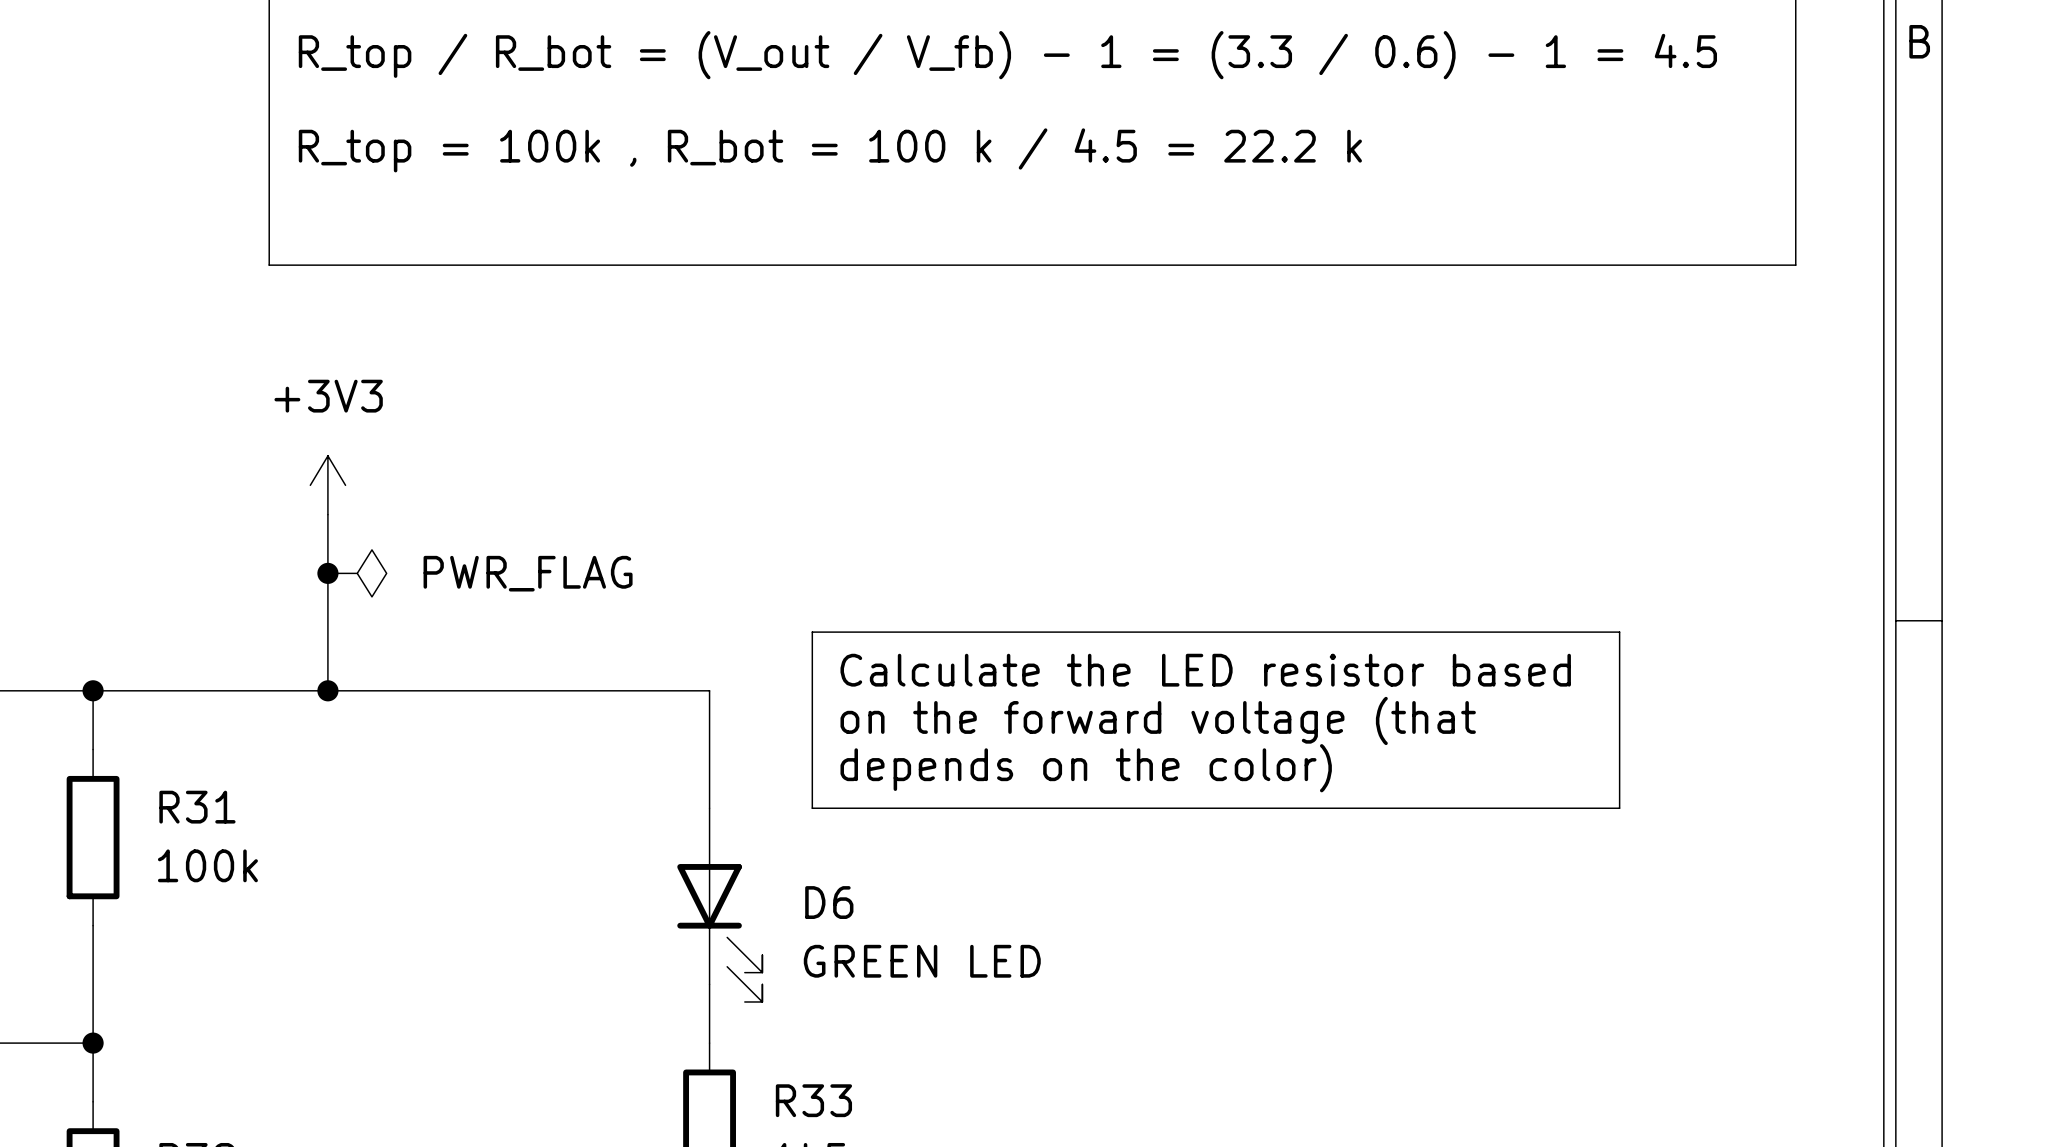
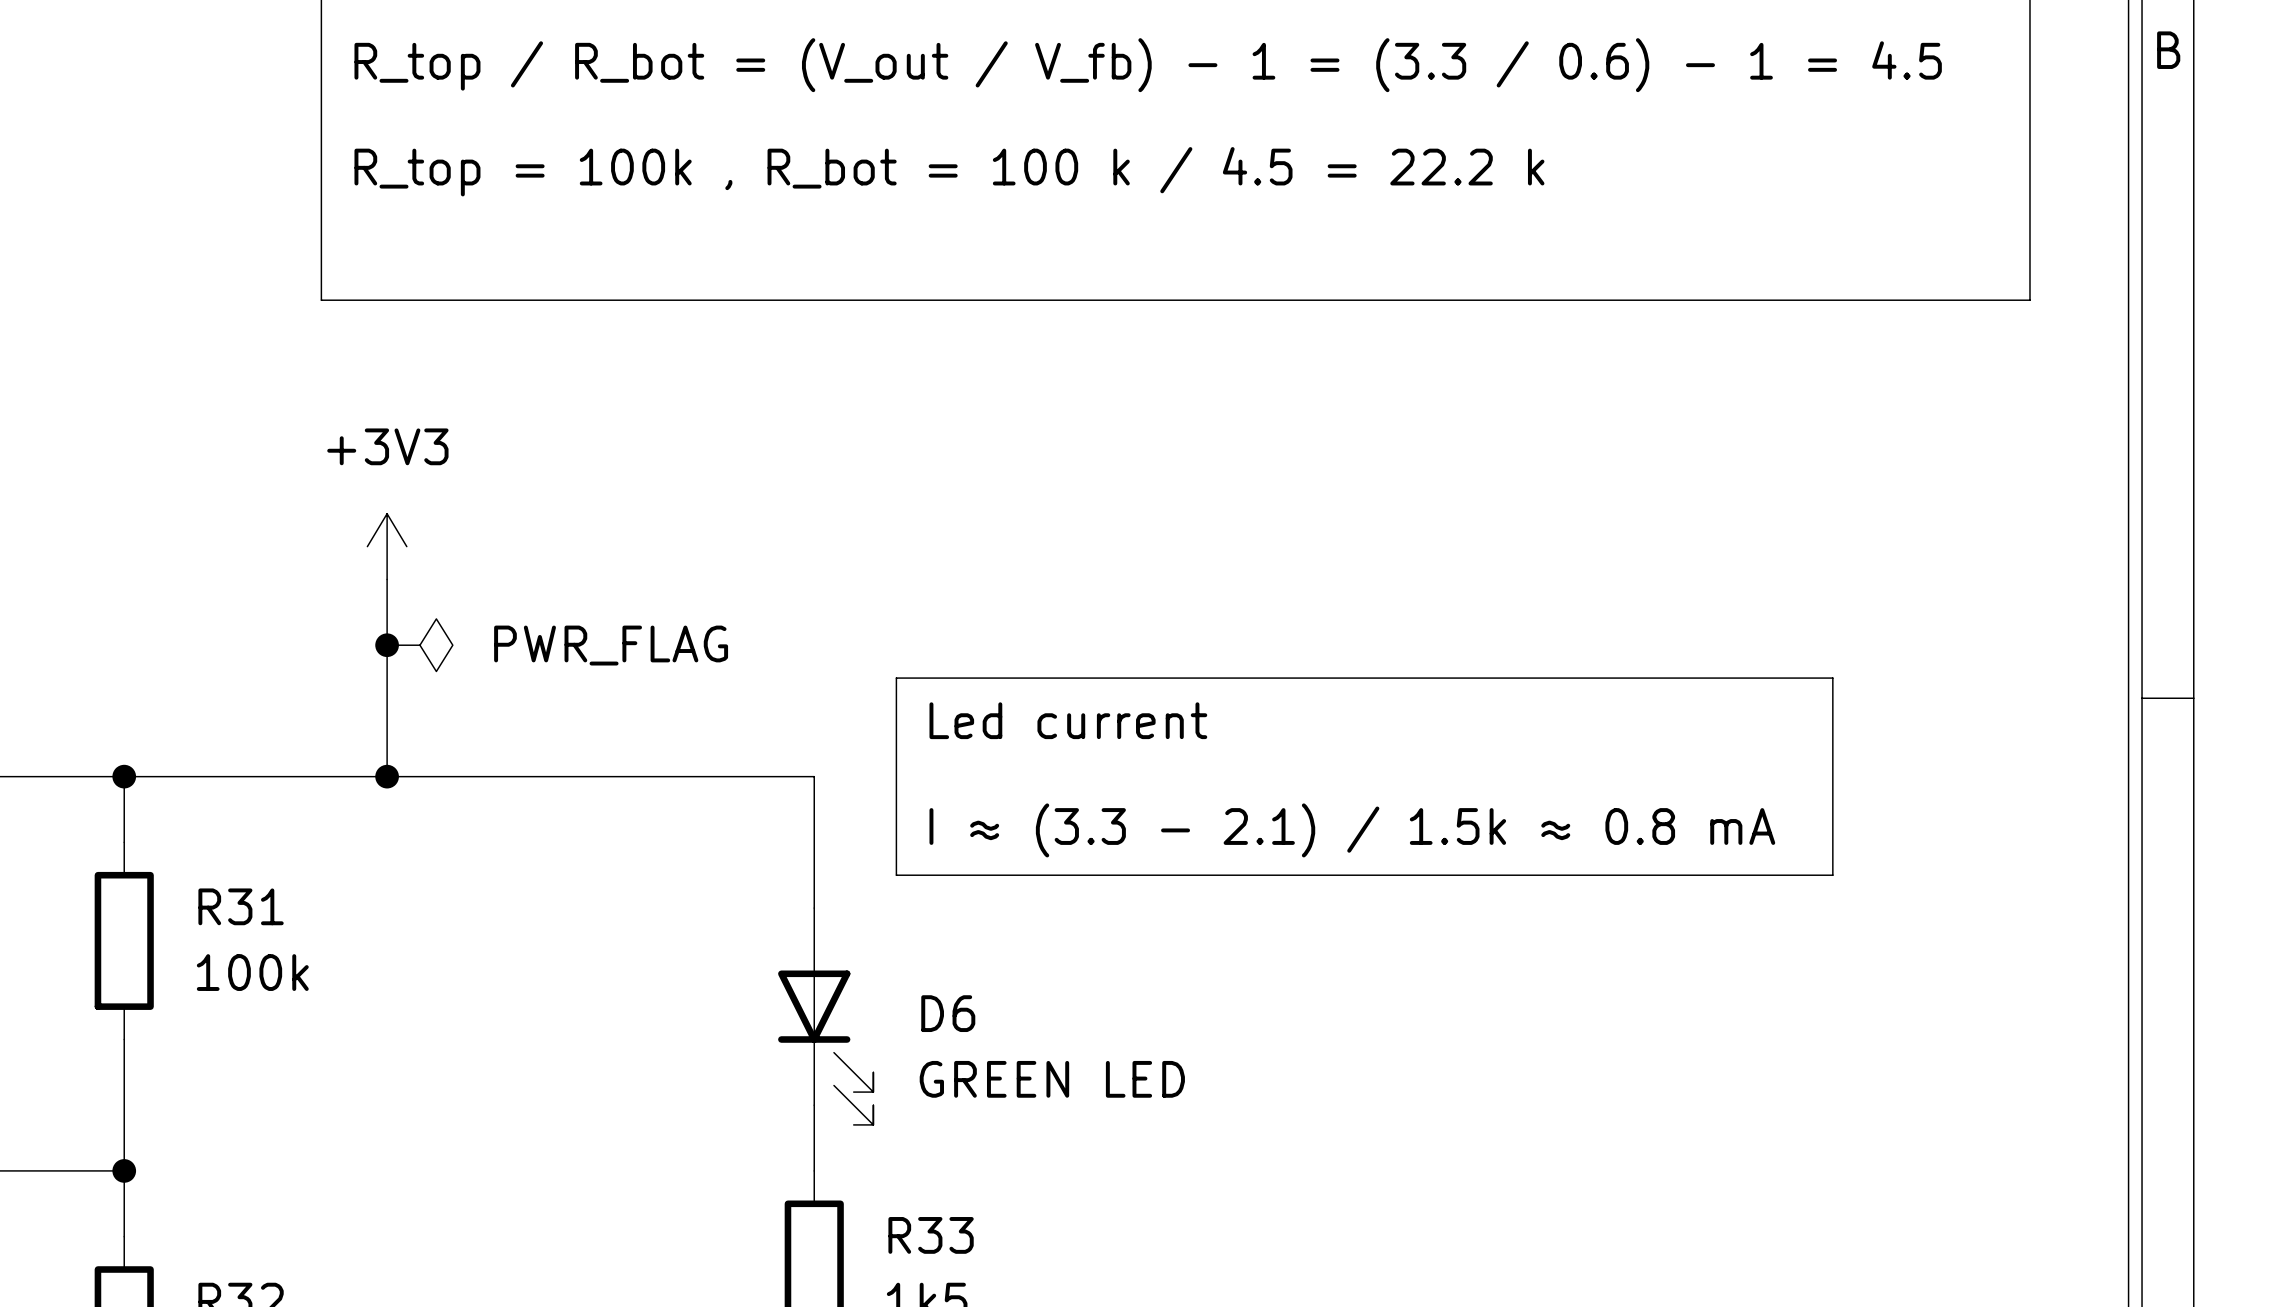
line: (1619, 632) (812, 632) (812, 808) (1619, 808) (1619, 778) -> (1832, 710) (1832, 678) (896, 678) (896, 875) (1832, 875)
text: none -> Led current (1068, 720)
text: Calculate the LED resistor based (1205, 670) -> none
text: on the forward voltage (that (1158, 720) -> none
text: none -> I ≈ (3.3 - 2.1) / 1.5k ≈ 0.8 mA (1352, 830)
text: depends on the color) (1086, 768) -> none

